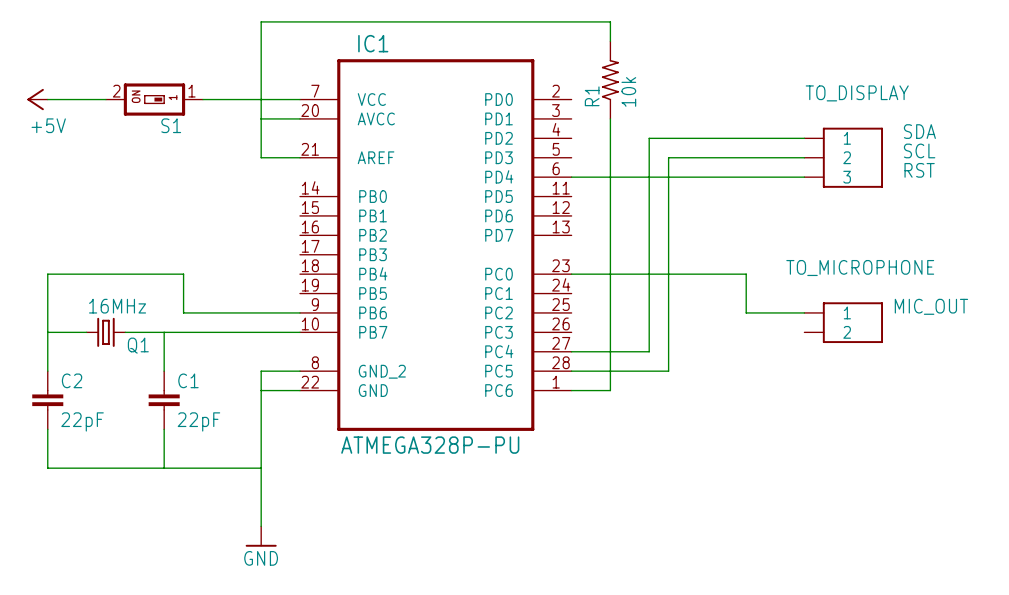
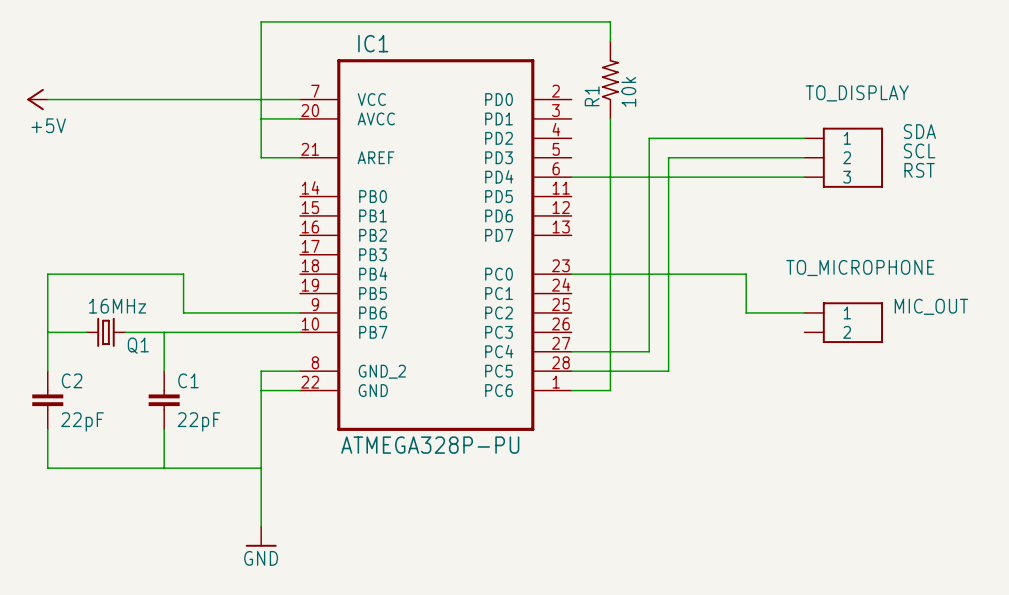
S1: (154, 99) -> none

